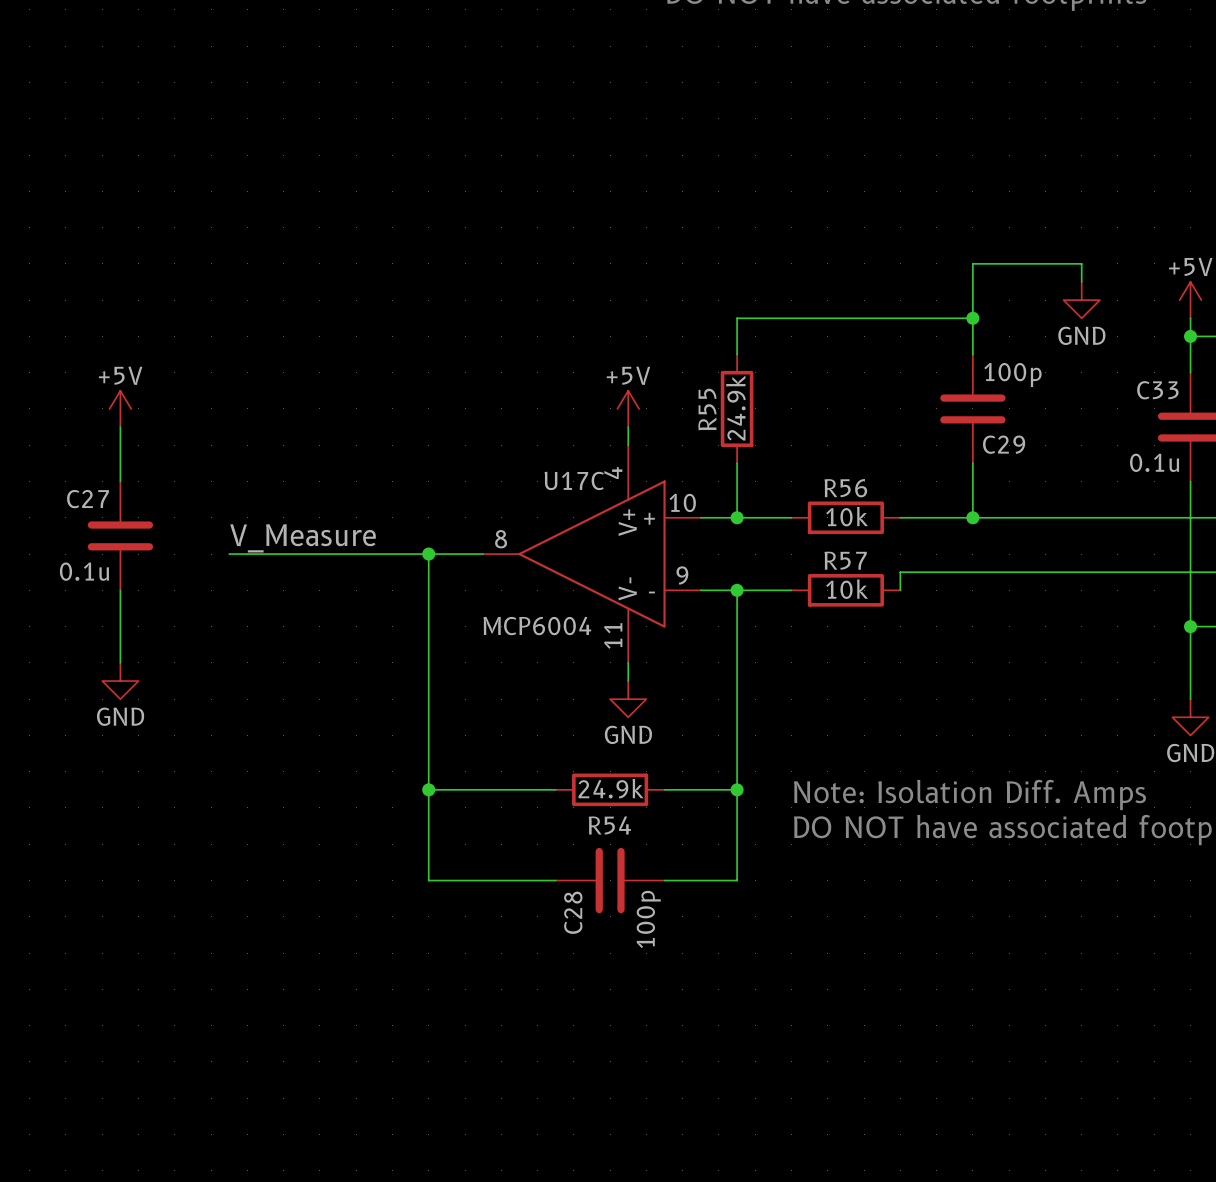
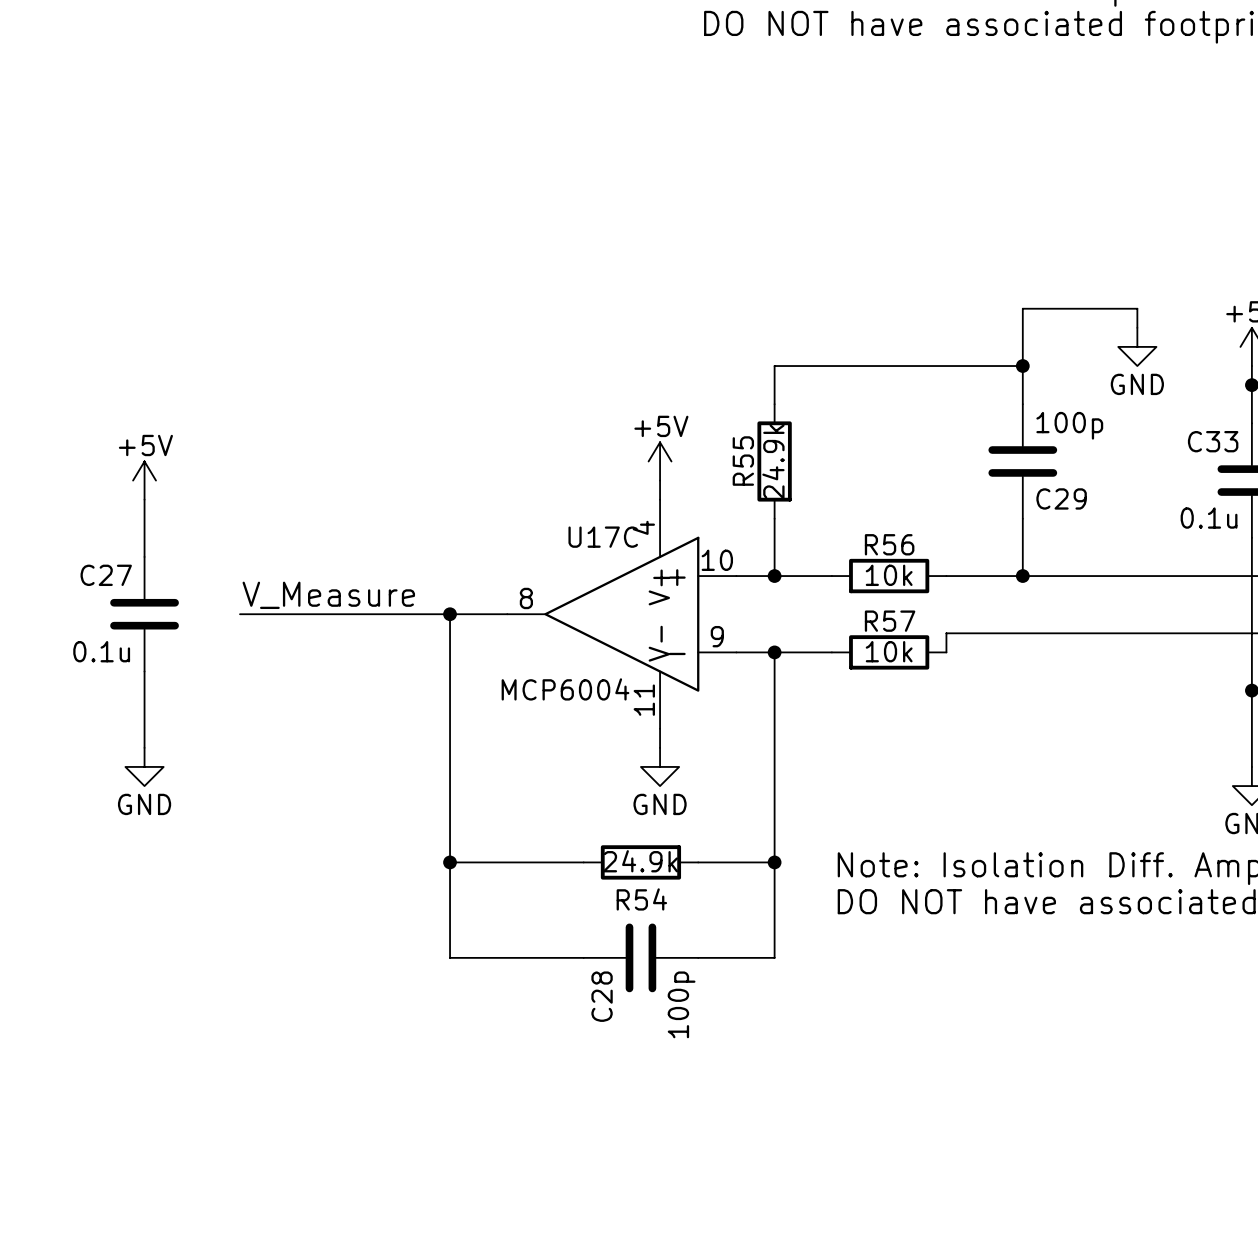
power symbol position: +5V (120, 408) -> +5V (144, 480)
wire: (120, 427) (120, 481) -> (144, 499) (144, 556)
C27 position: (120, 535) -> (144, 614)
wire: (120, 590) (120, 662) -> (144, 671) (144, 747)
power symbol position: GND (120, 681) -> GND (144, 766)

